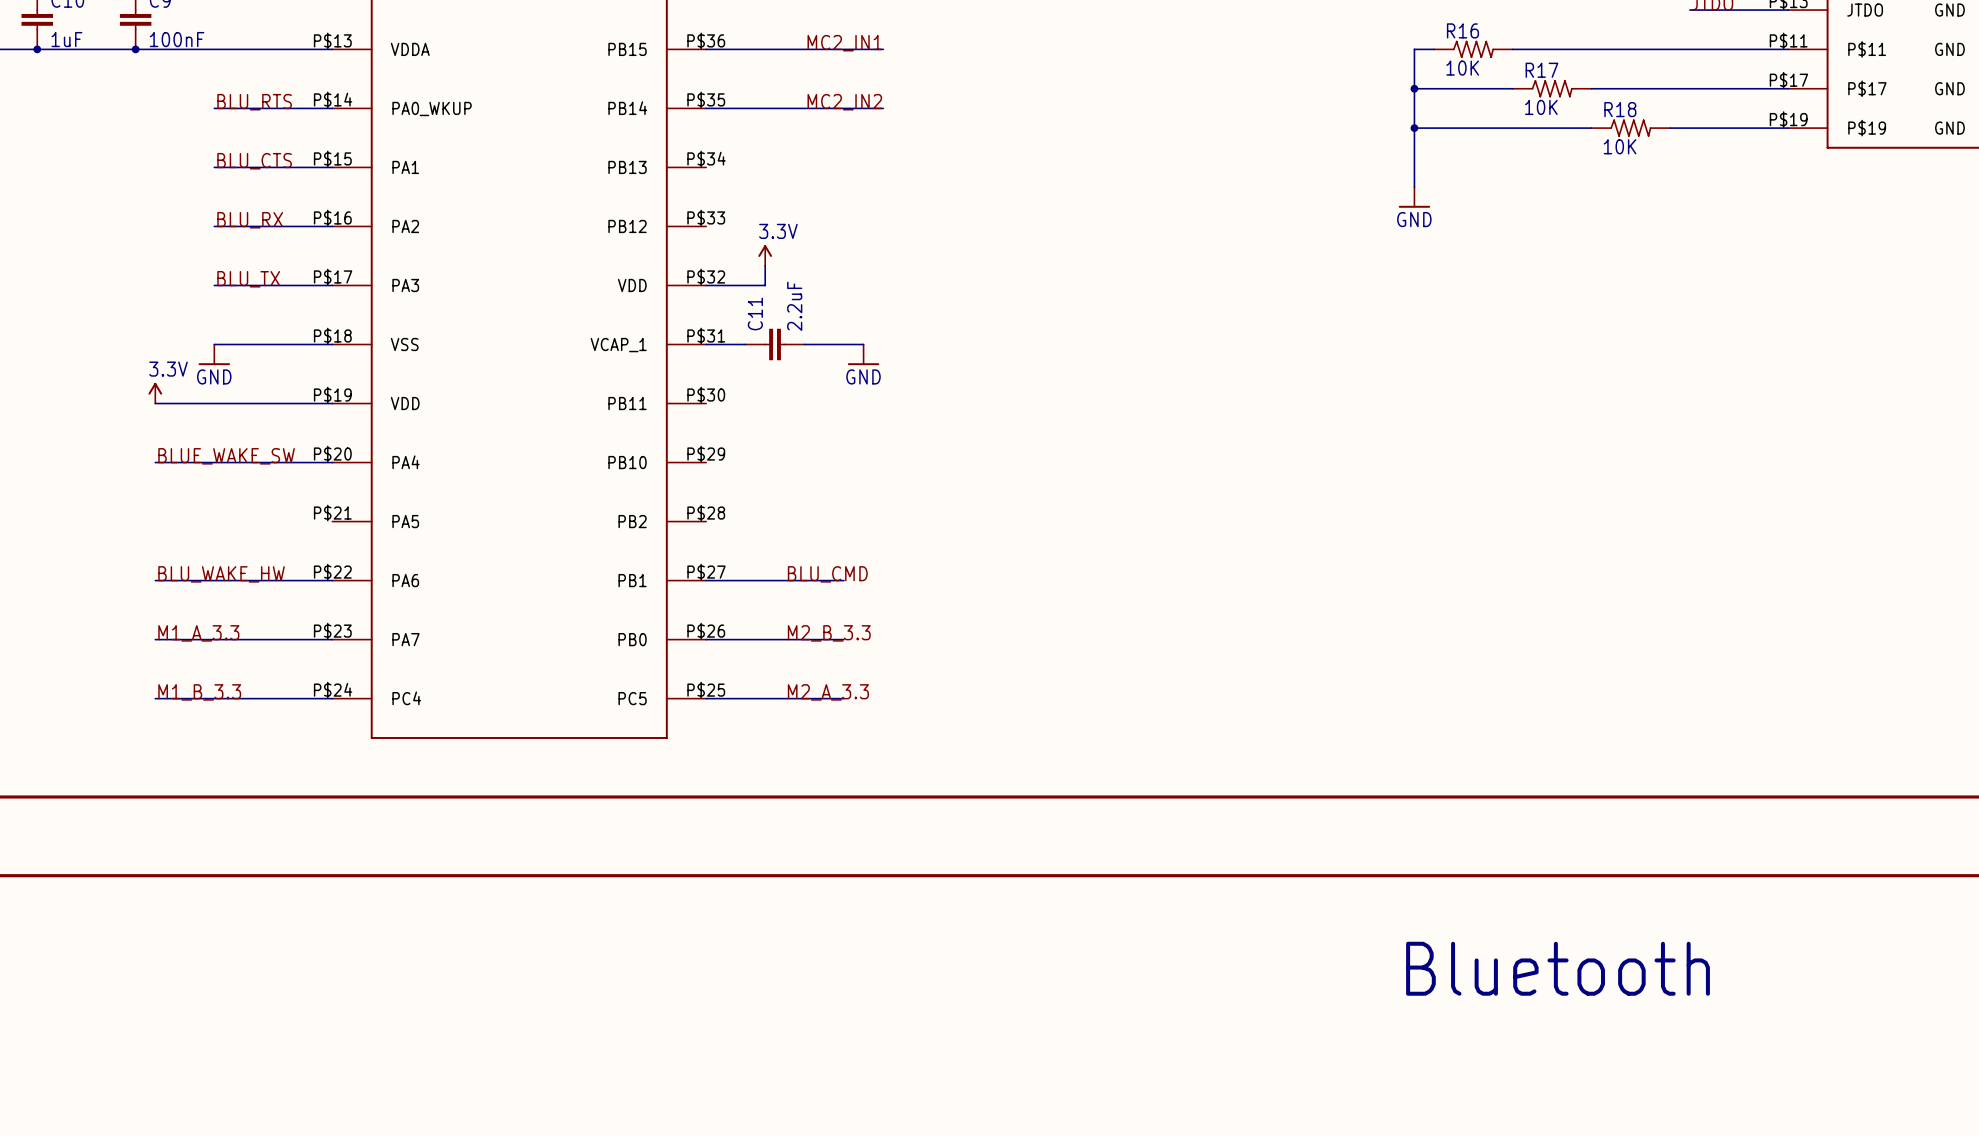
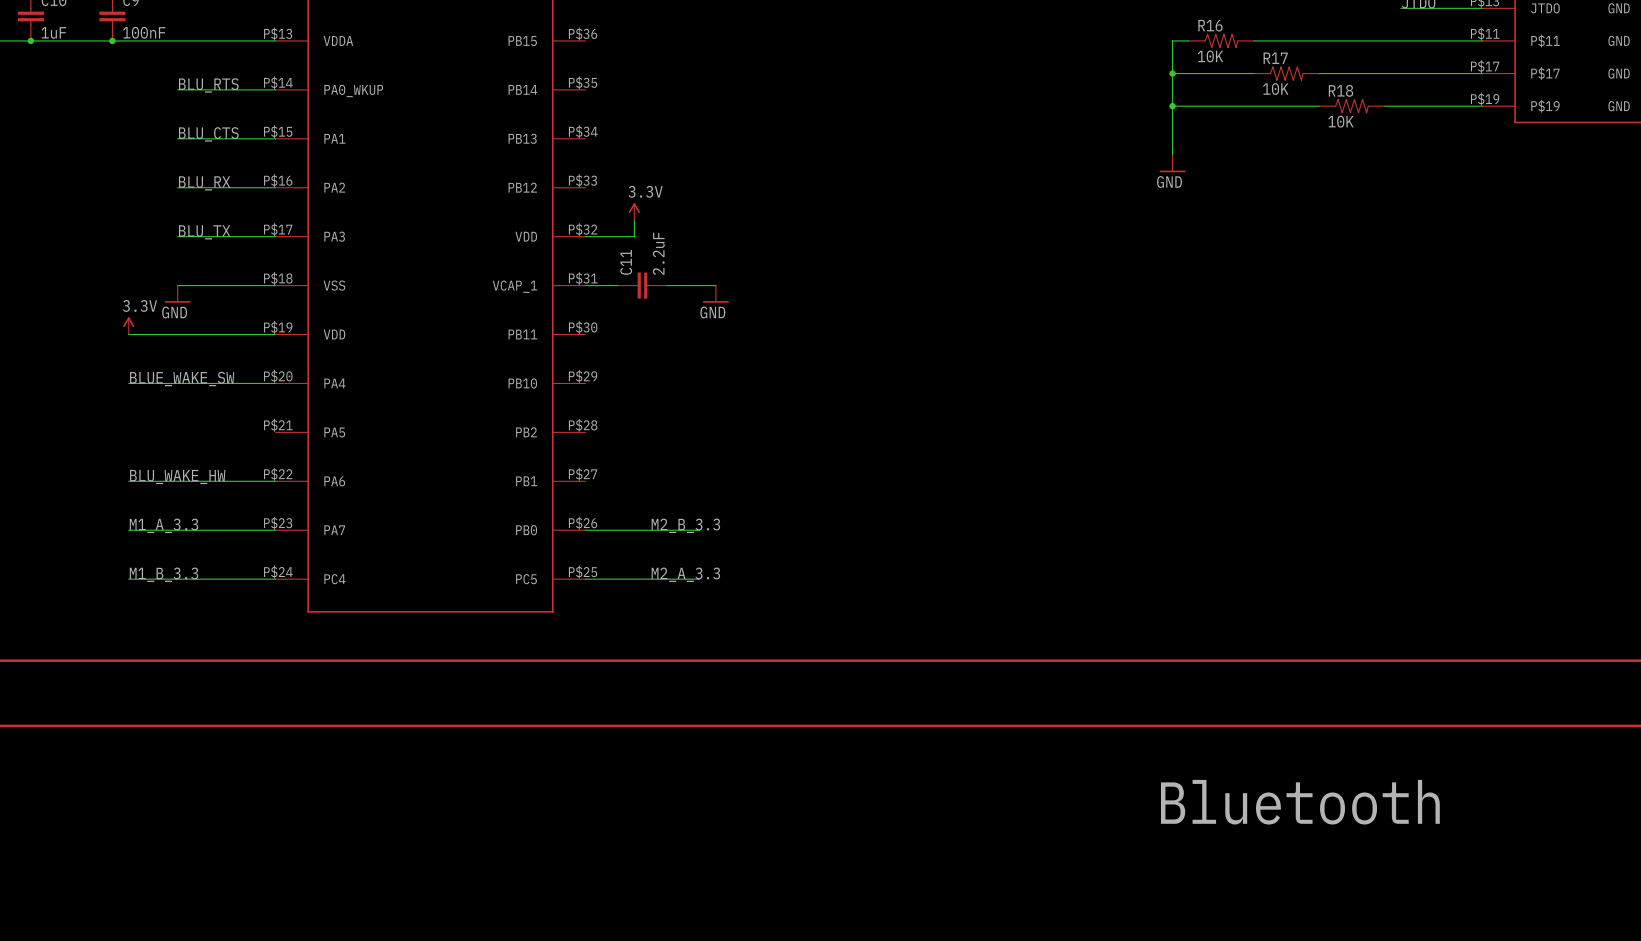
label: MC2_IN1 (844, 43) -> none
wire: (706, 49) (883, 49) -> none
label: MC2_IN2 (844, 102) -> none
wire: (706, 108) (883, 108) -> none
label: BLU_CMD (827, 574) -> none
wire: (706, 580) (843, 580) -> none

